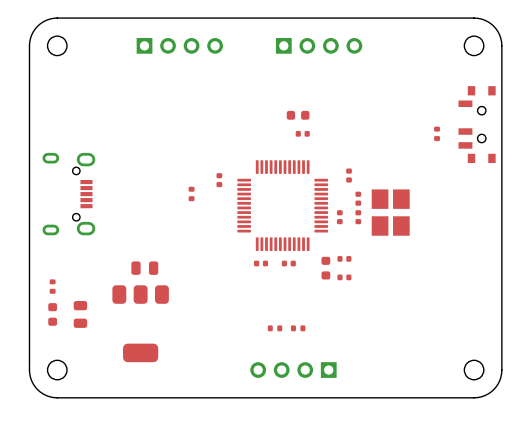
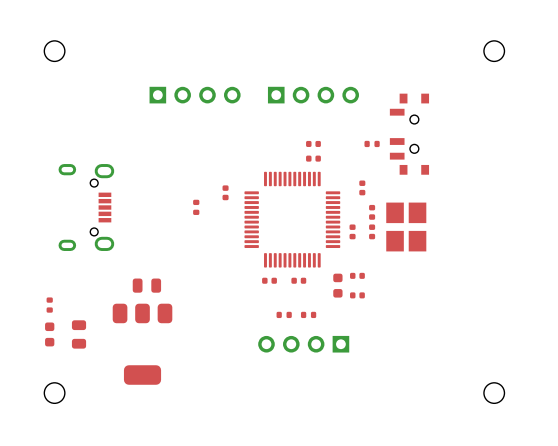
board edge: (474, 18) (57, 18) (40, 23) (33, 31) (29, 45) (29, 370) (35, 386) (46, 395) (57, 397) (474, 397) (490, 392) (498, 383) (501, 370) (501, 45) (499, 35) (493, 26) (484, 20) (474, 18) -> none
part position: (179, 45) -> (195, 95)
part position: (319, 45) -> (313, 95)
part: (298, 115) -> none
part position: (477, 124) -> (409, 134)
part rotation: 0° (437, 133) -> 90° clockwise (372, 143)
part position: (437, 133) -> (372, 143)
part: none -> (313, 158)
part position: (68, 194) -> (86, 207)
part: none -> (284, 314)
part: none -> (308, 314)
part footprint: [290, 325, 306, 332] -> [258, 335, 350, 353]
part: (275, 328) -> none
part: (293, 370) -> none

